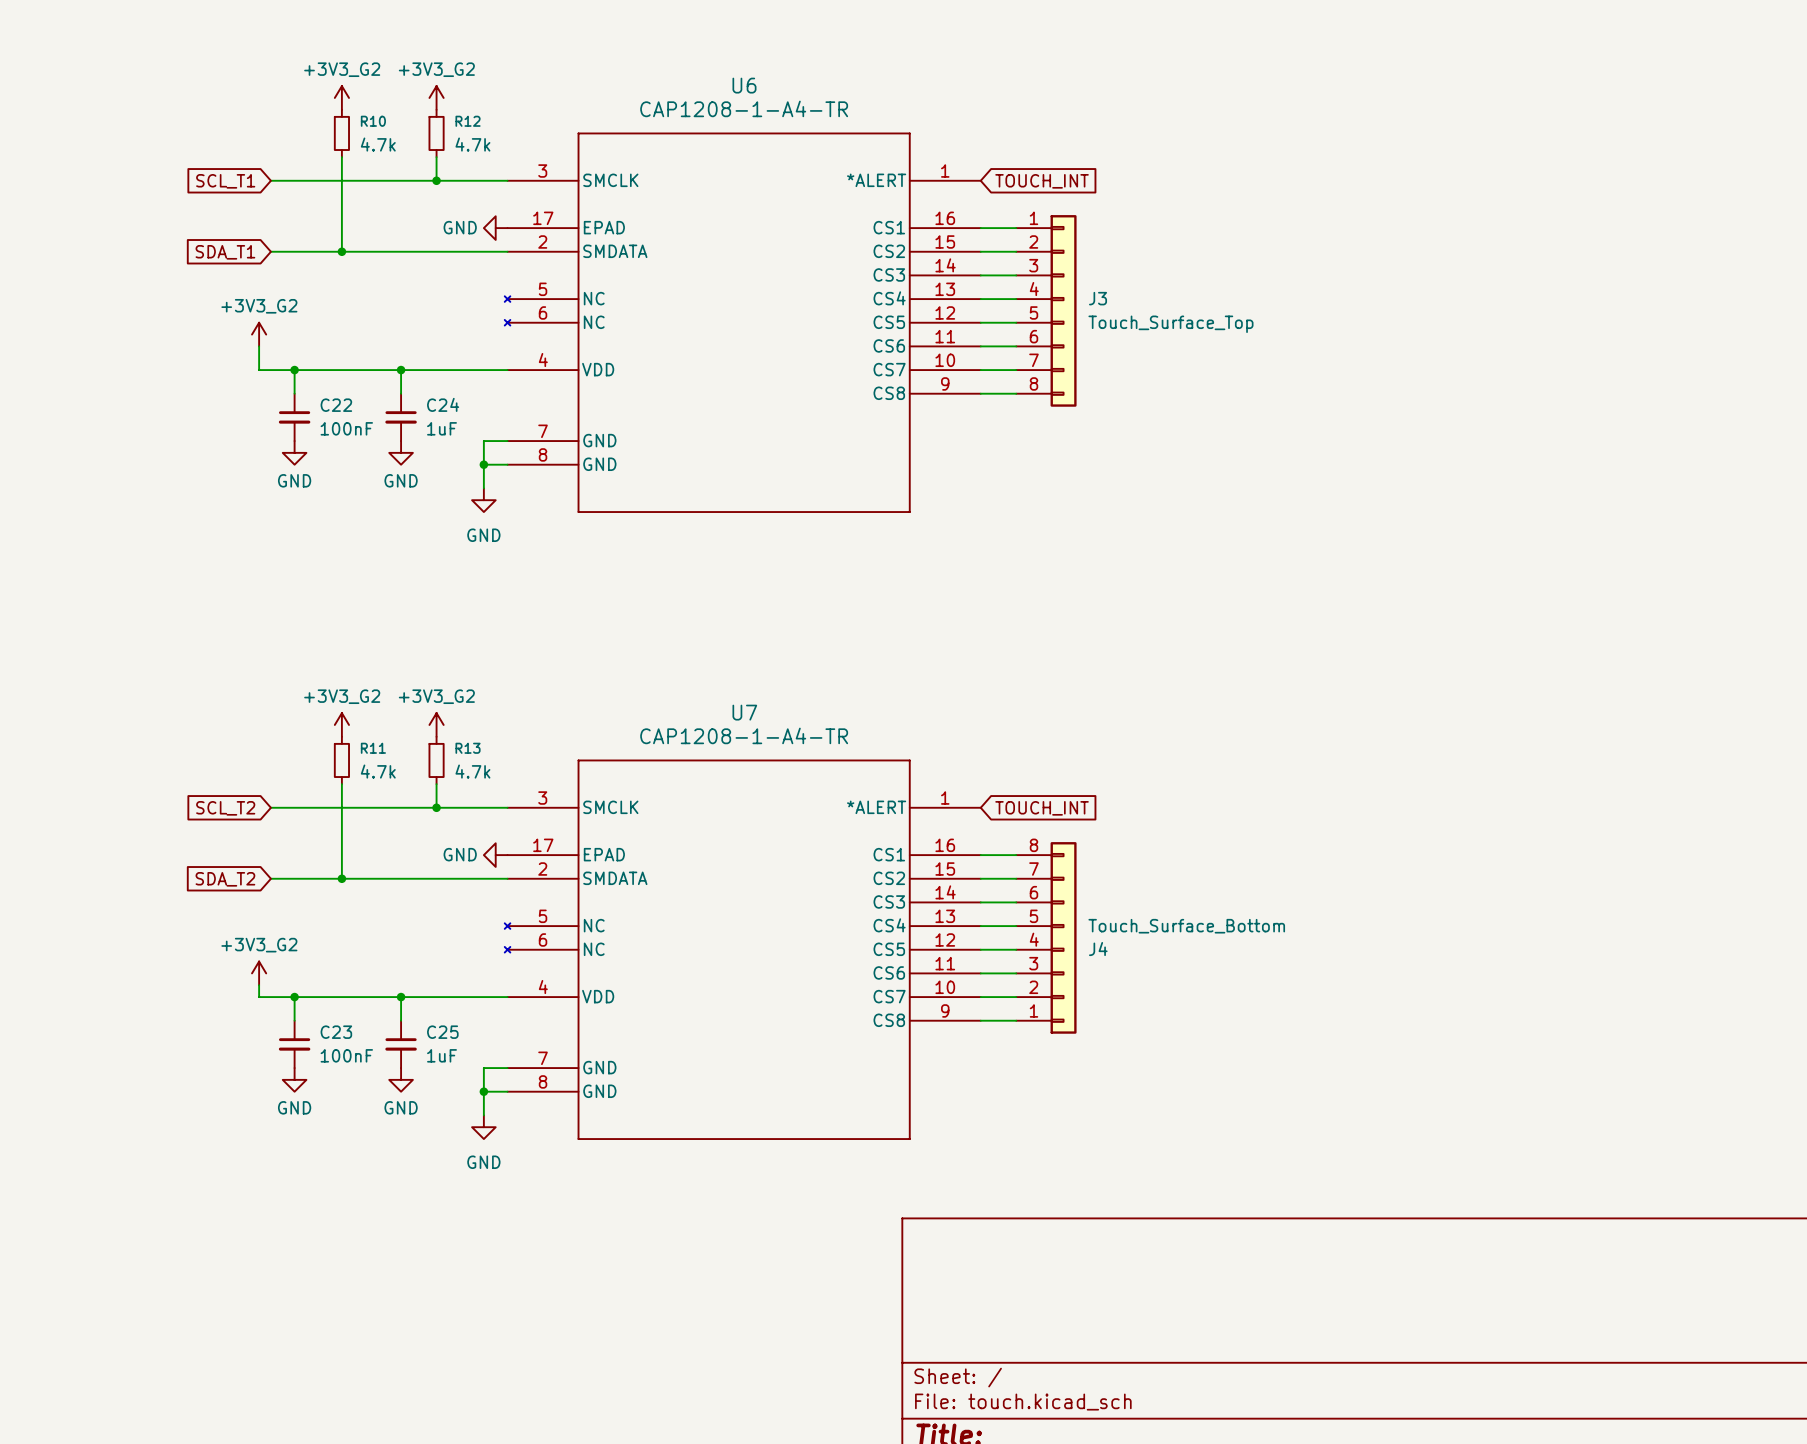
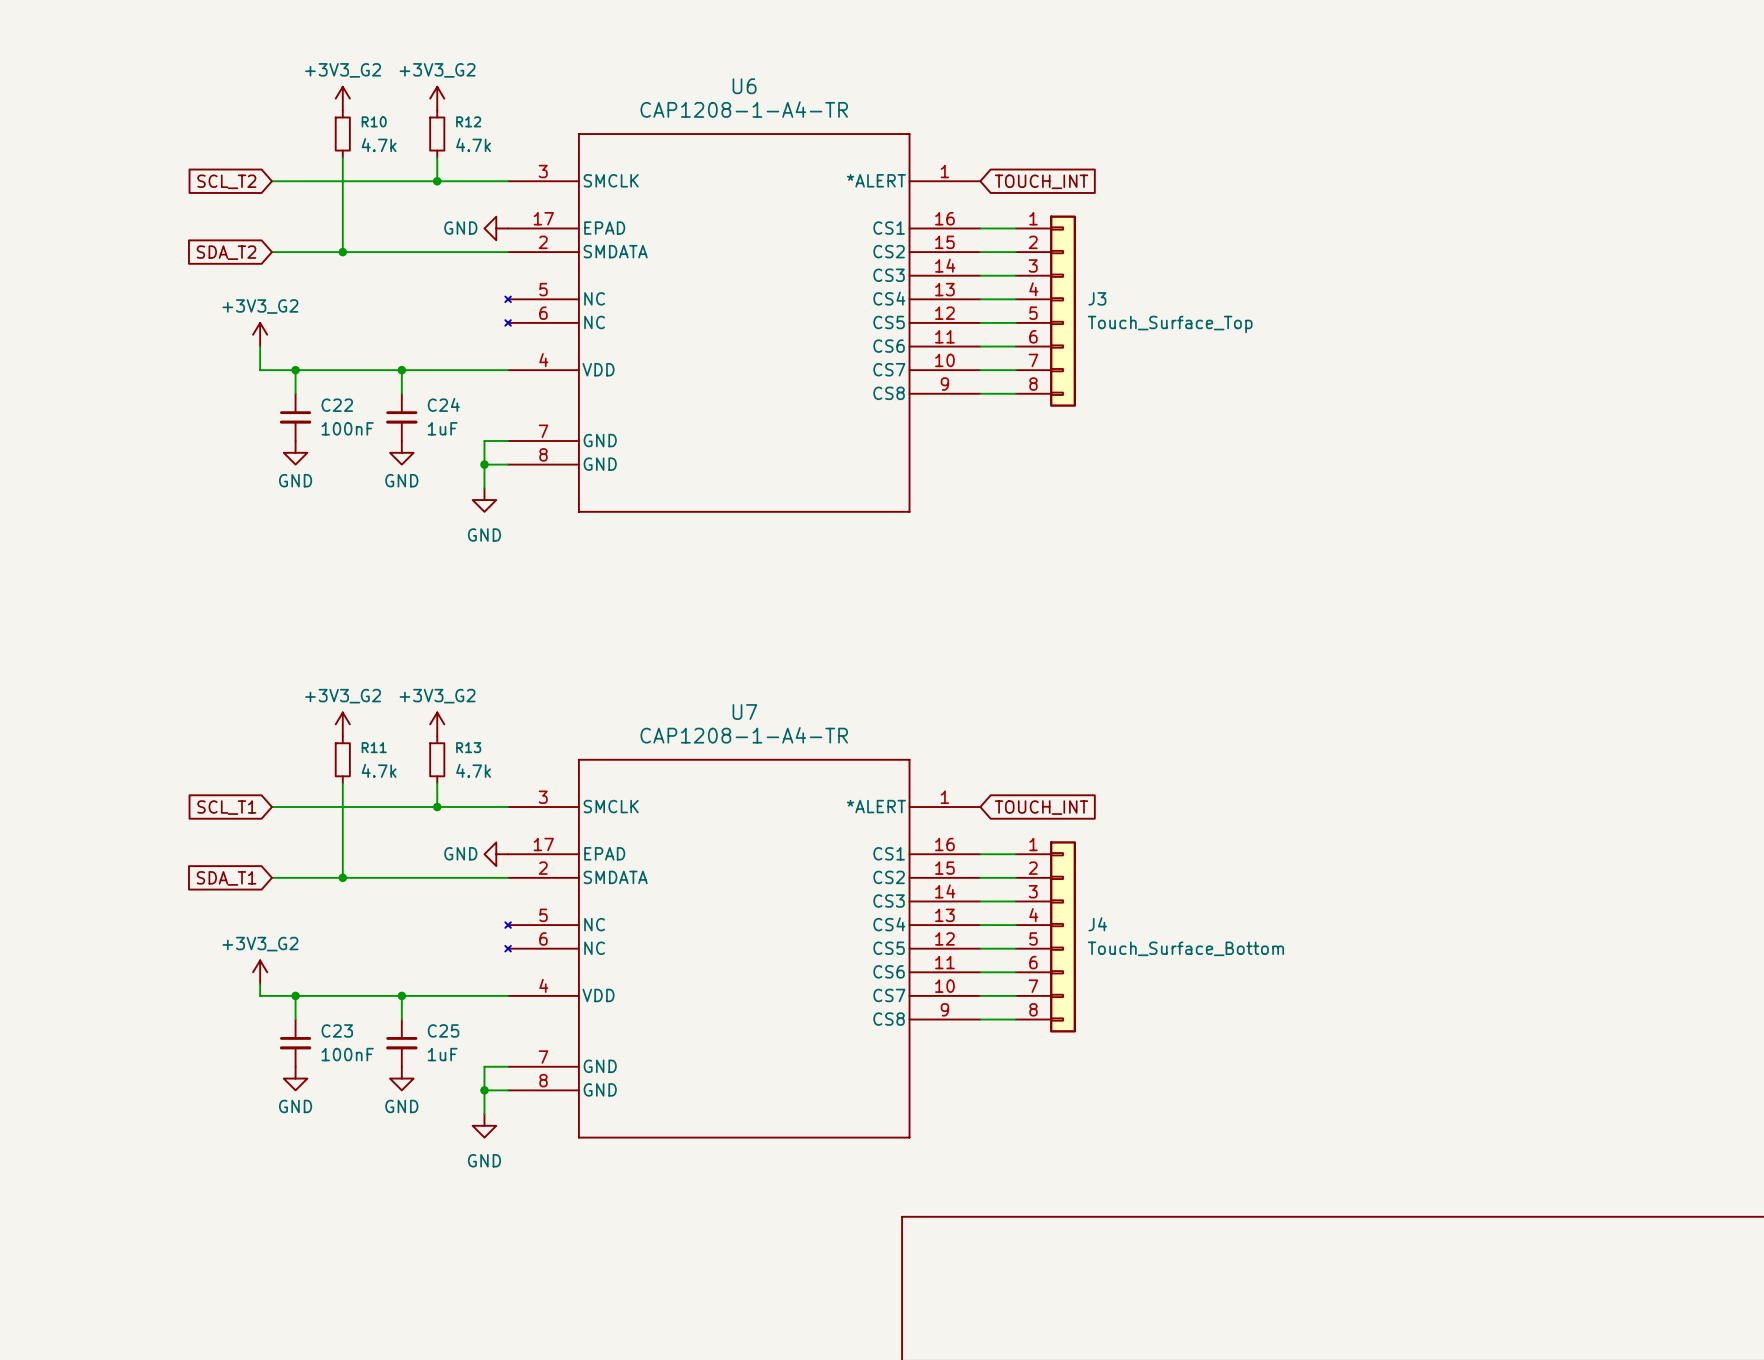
global label: SCL_T1 (225, 181) -> SCL_T2 (226, 181)
global label: SDA_T1 (225, 252) -> SDA_T2 (226, 252)
global label: SCL_T2 (225, 808) -> SCL_T1 (226, 807)
global label: SDA_T2 (225, 879) -> SDA_T1 (226, 878)
J4 flip: as is (1063, 937) -> up-down (1063, 936)

